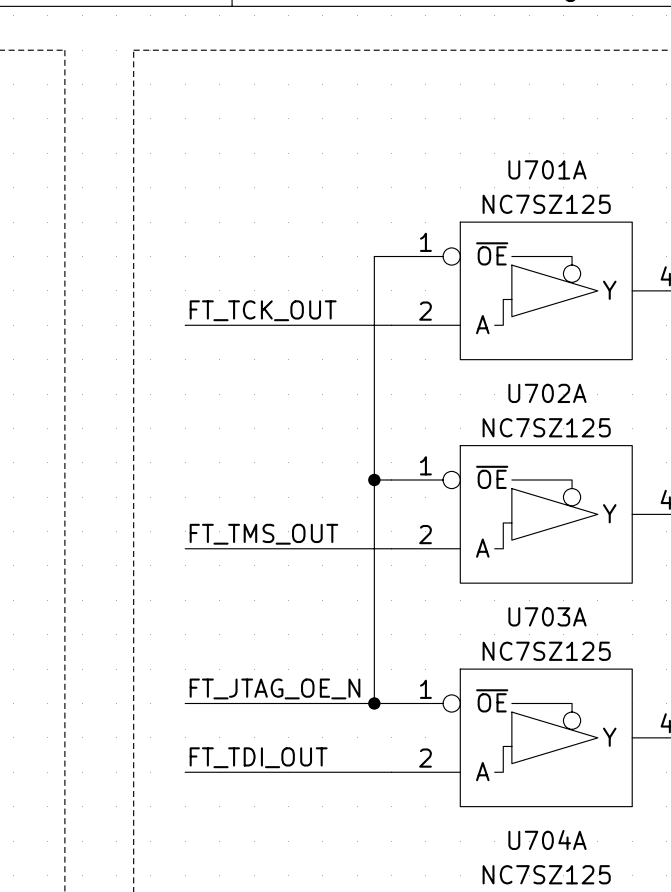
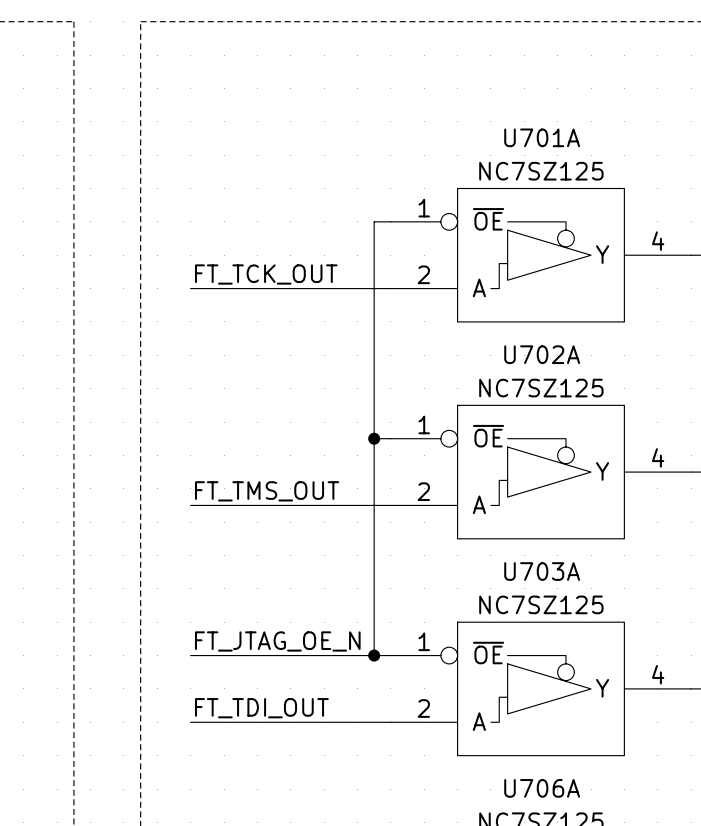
U704A name: U704A (547, 839) -> U706A (542, 788)

